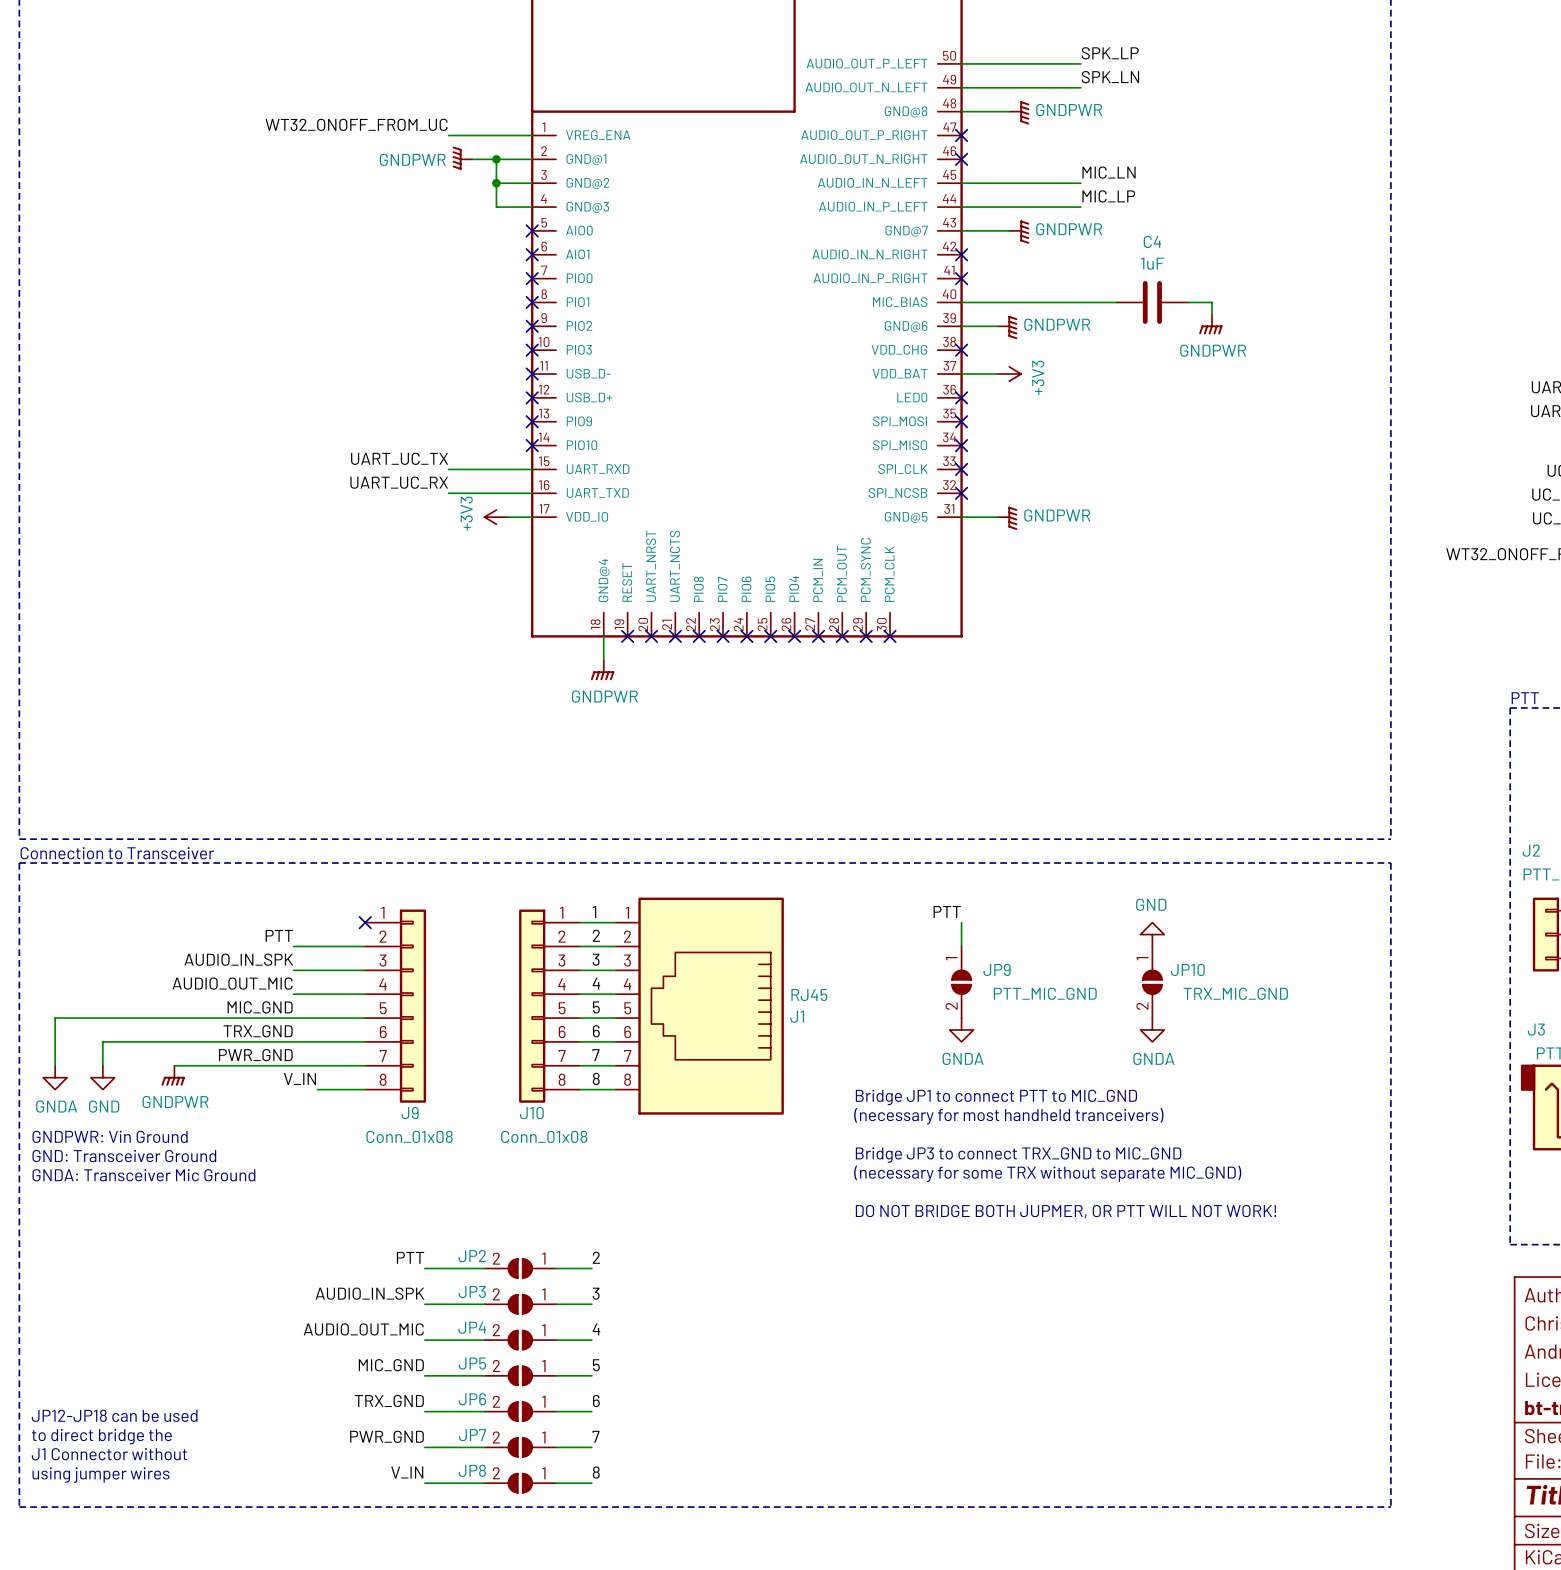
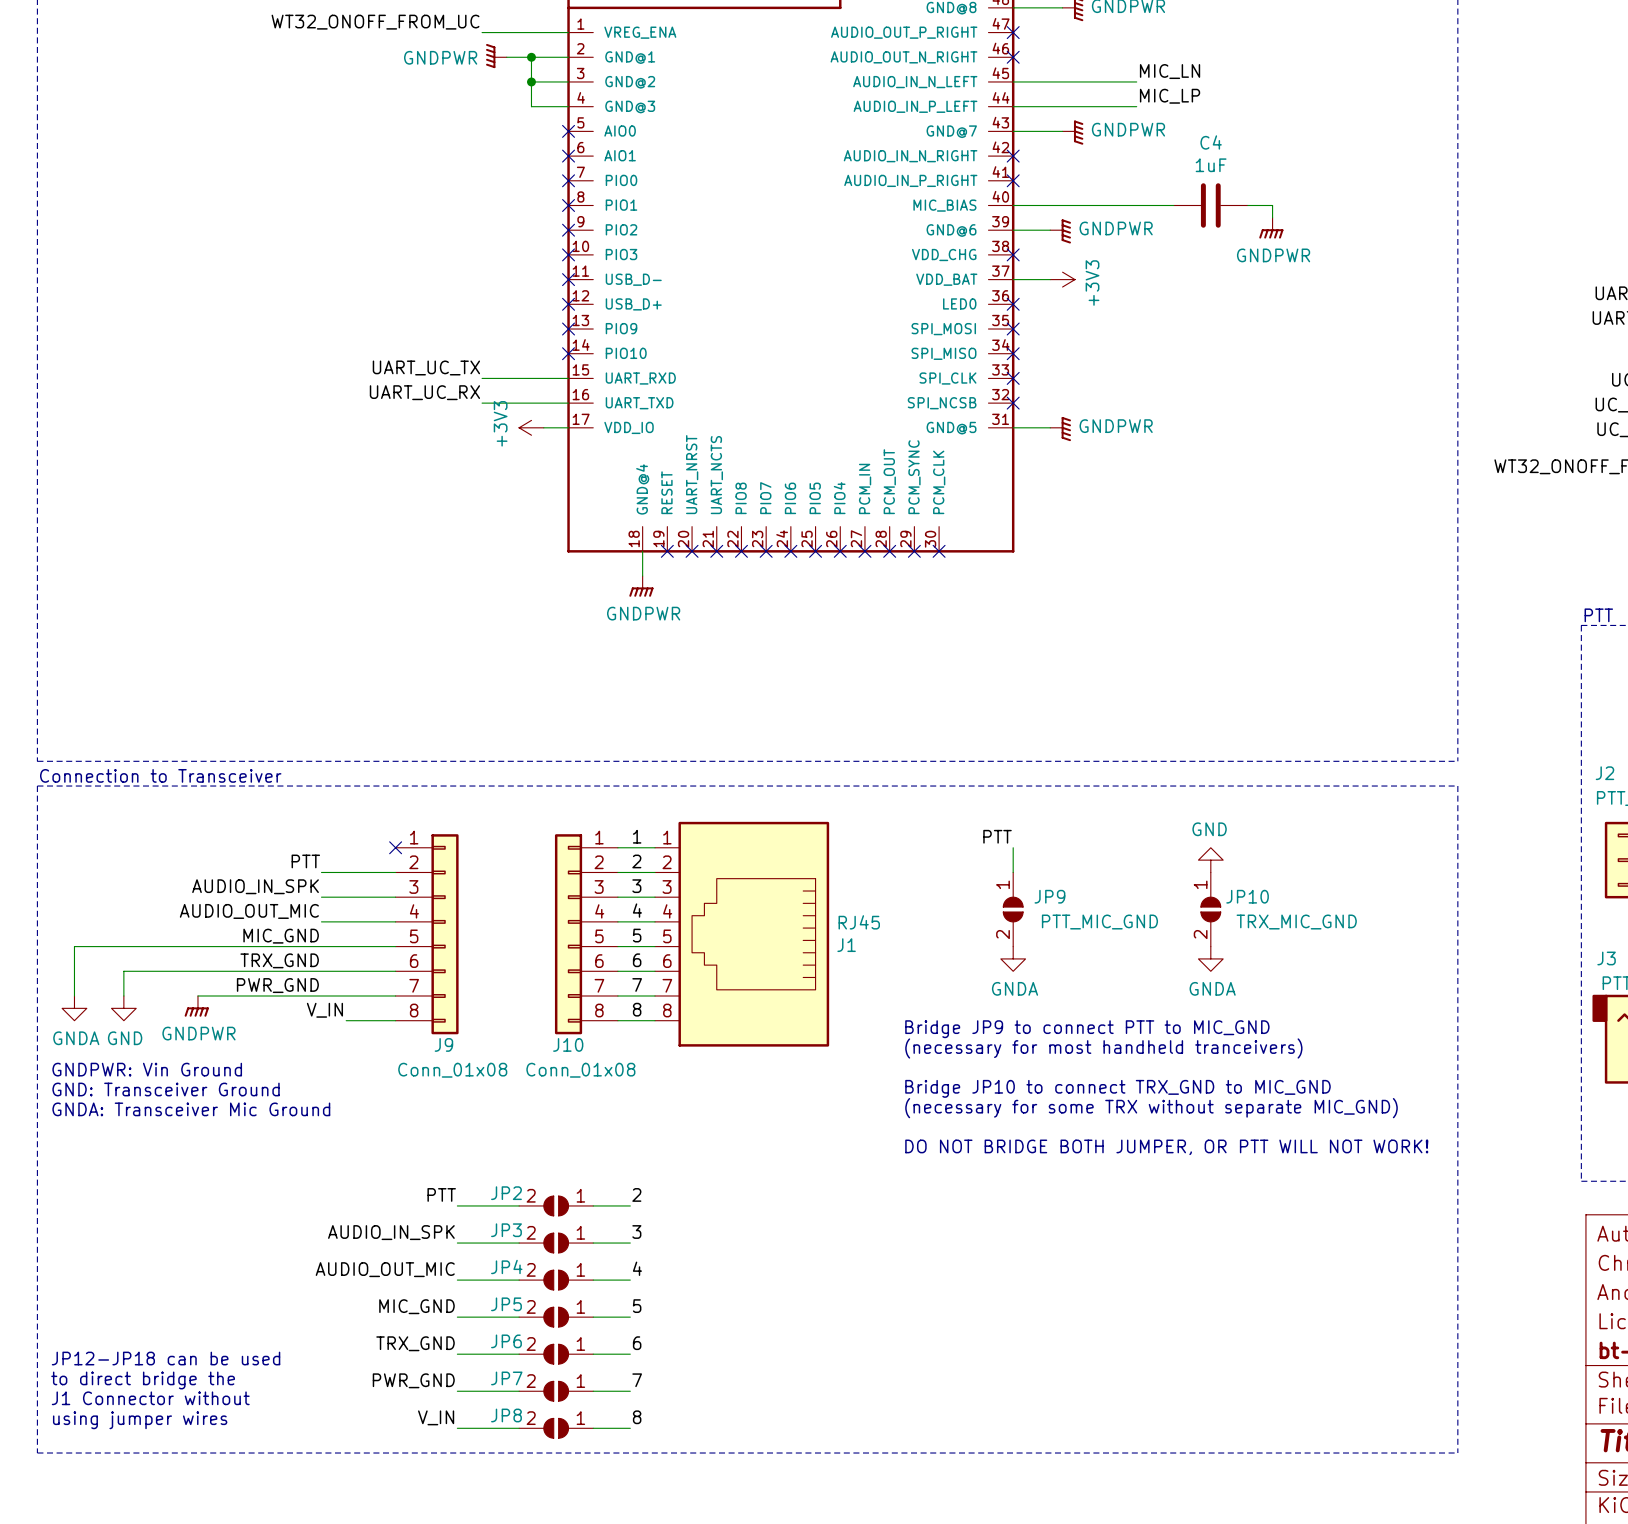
text: Bridge JP1 to connect PTT to MIC_GND (996, 1097) -> Bridge JP9 to connect PTT to MIC_GND (1087, 1029)
text: Bridge JP3 to connect TRX_GND to MIC_GND (1018, 1155) -> Bridge JP10 to connect TRX_GND to MIC_GND (1117, 1088)
text: DO NOT BRIDGE BOTH JUPMER, OR PTT WILL NOT WORK! (1066, 1211) -> DO NOT BRIDGE BOTH JUMPER, OR PTT WILL NOT WORK! (1166, 1147)

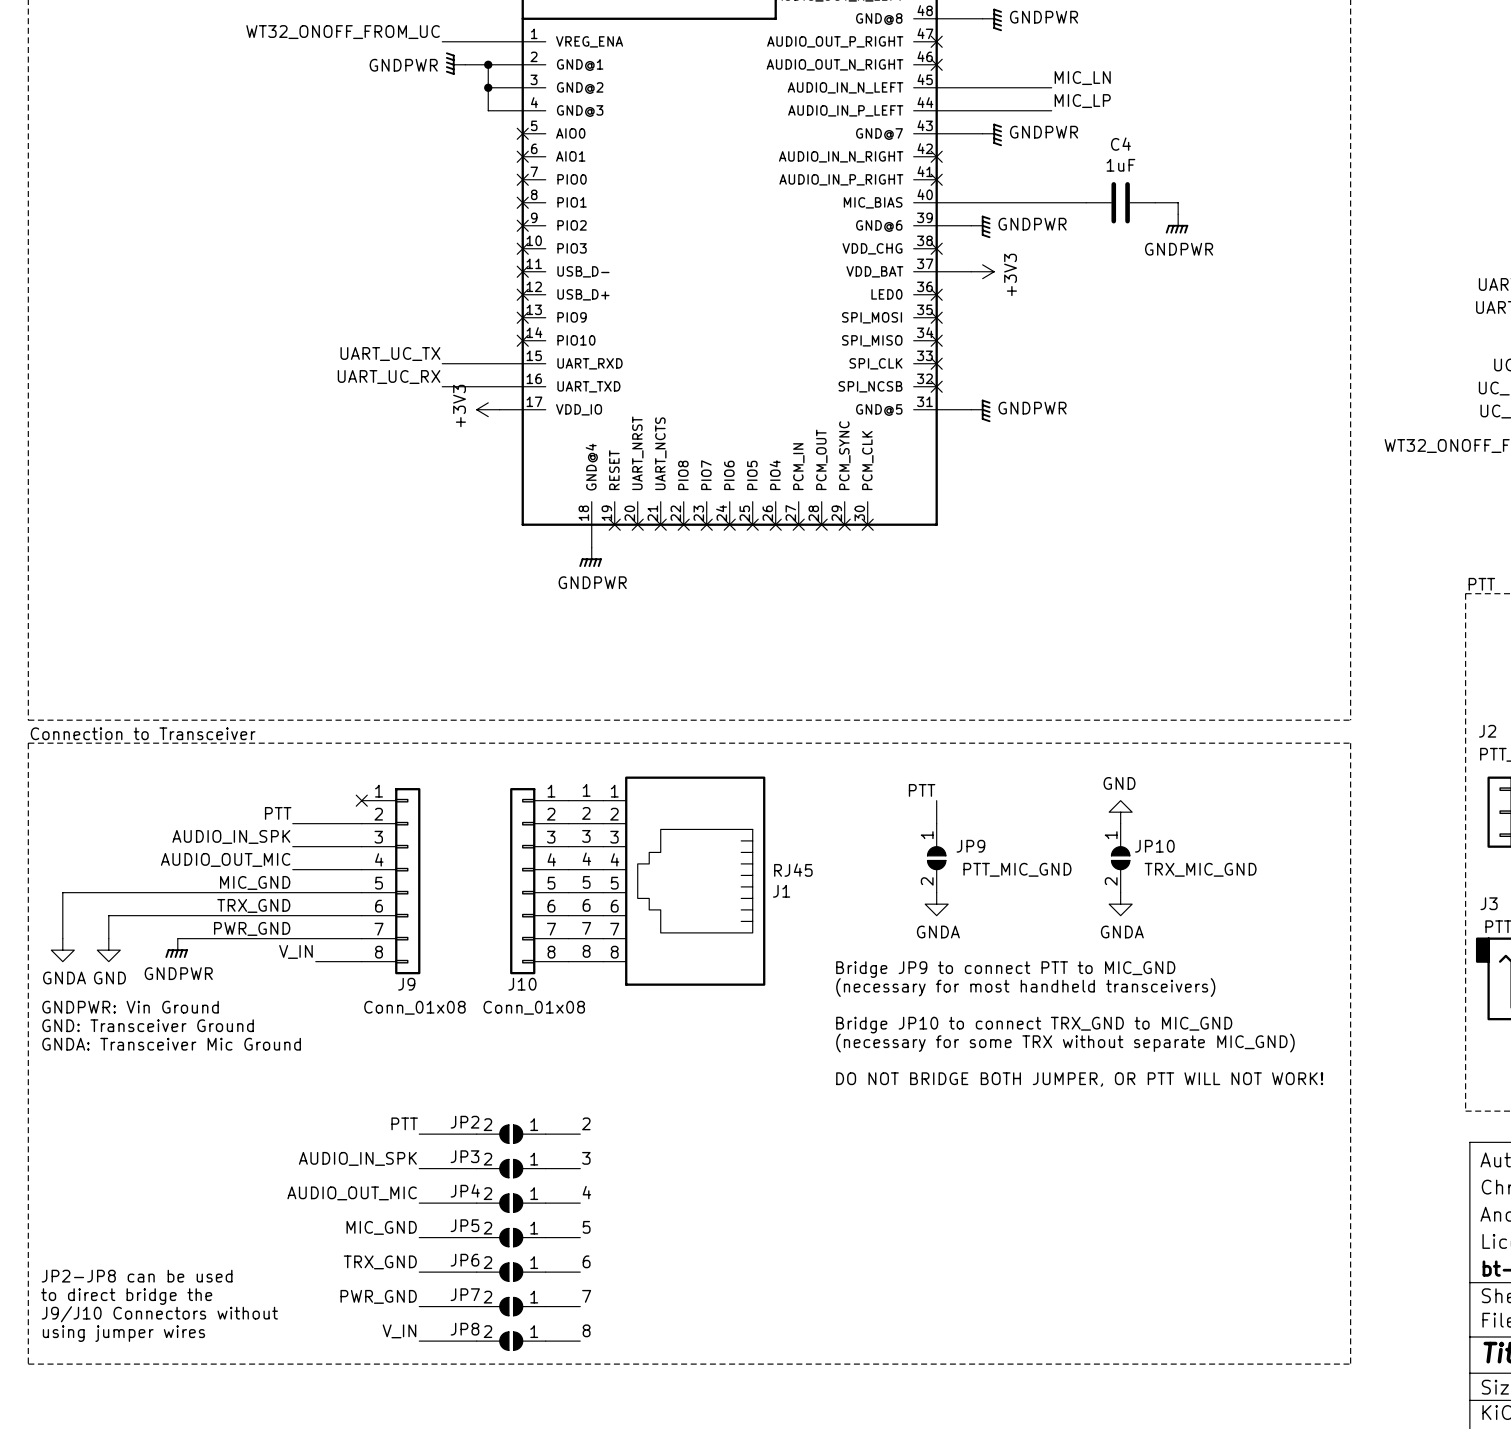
text: (necessary for most handheld tranceivers) (1103, 1048) -> (necessary for most handheld transceivers) (1025, 987)
text: JP12-JP18 can be used (166, 1358) -> JP2-JP8 can be used (137, 1276)
text: J1 Connector without (150, 1398) -> J9/J10 Connectors without (159, 1314)

